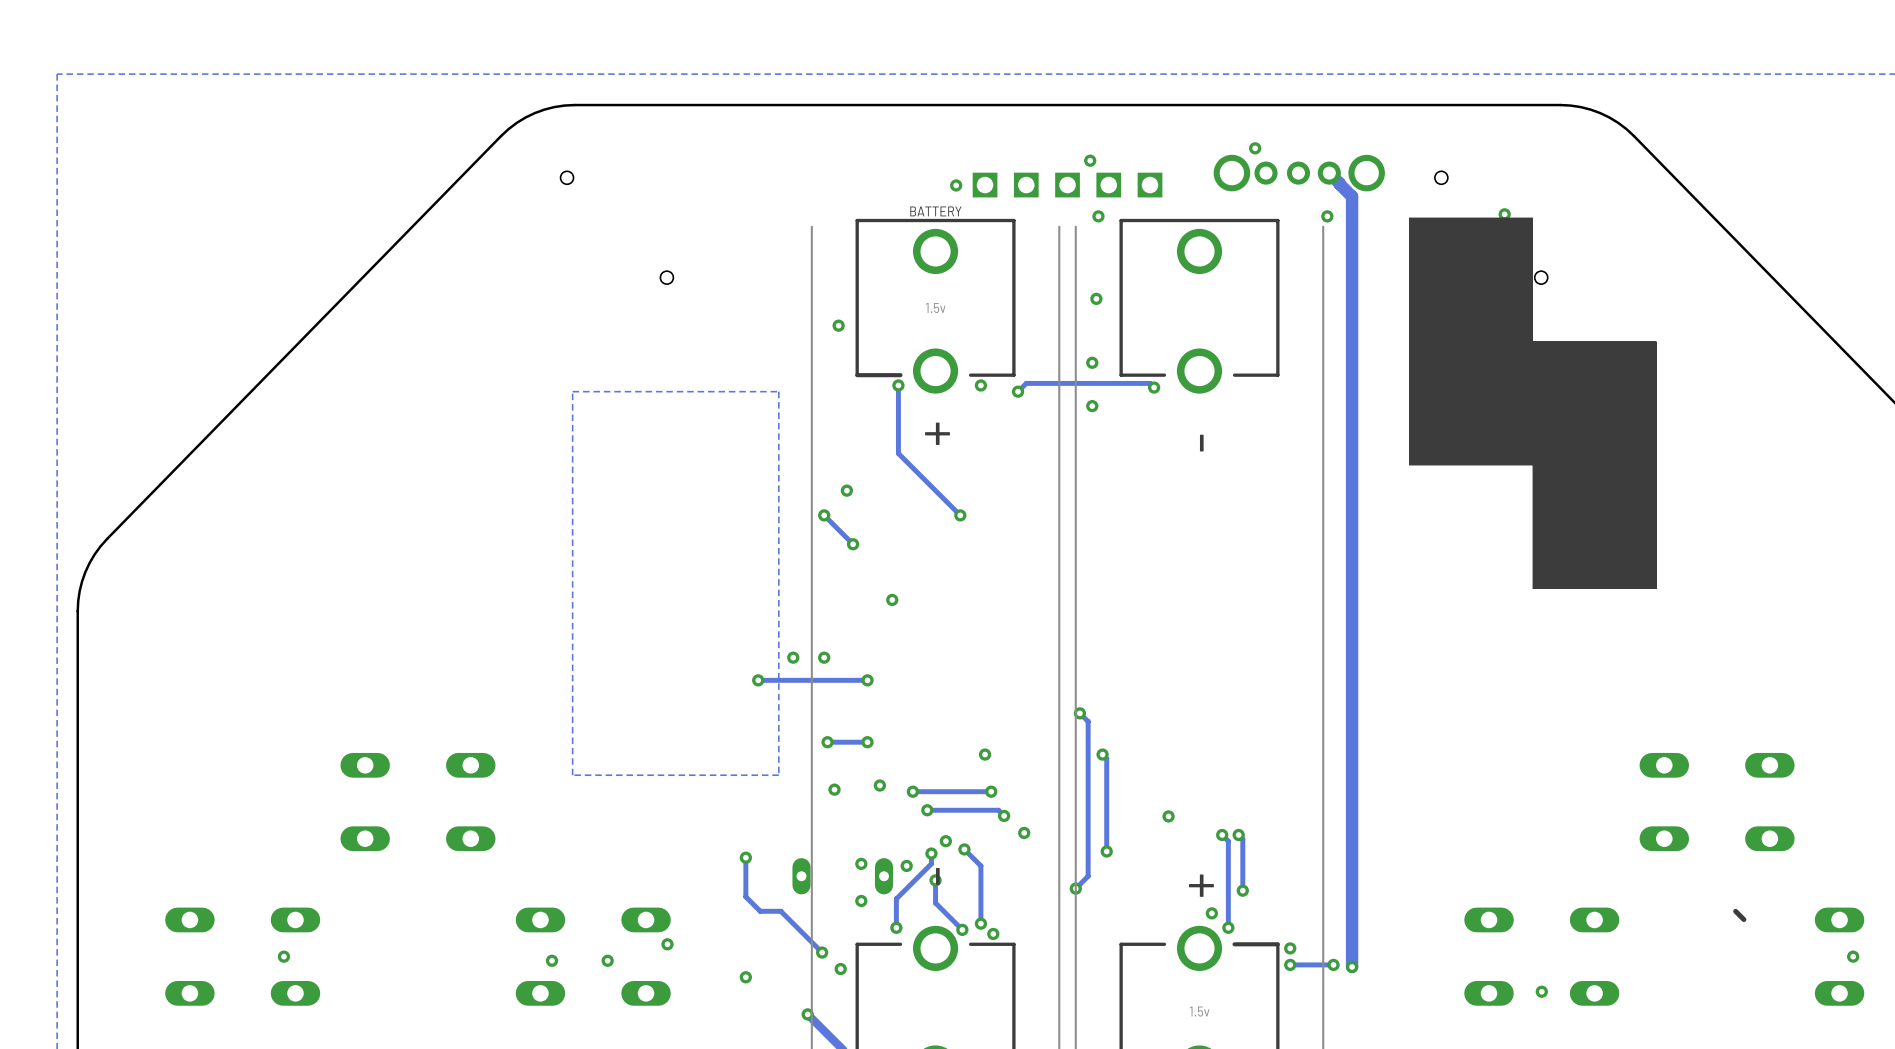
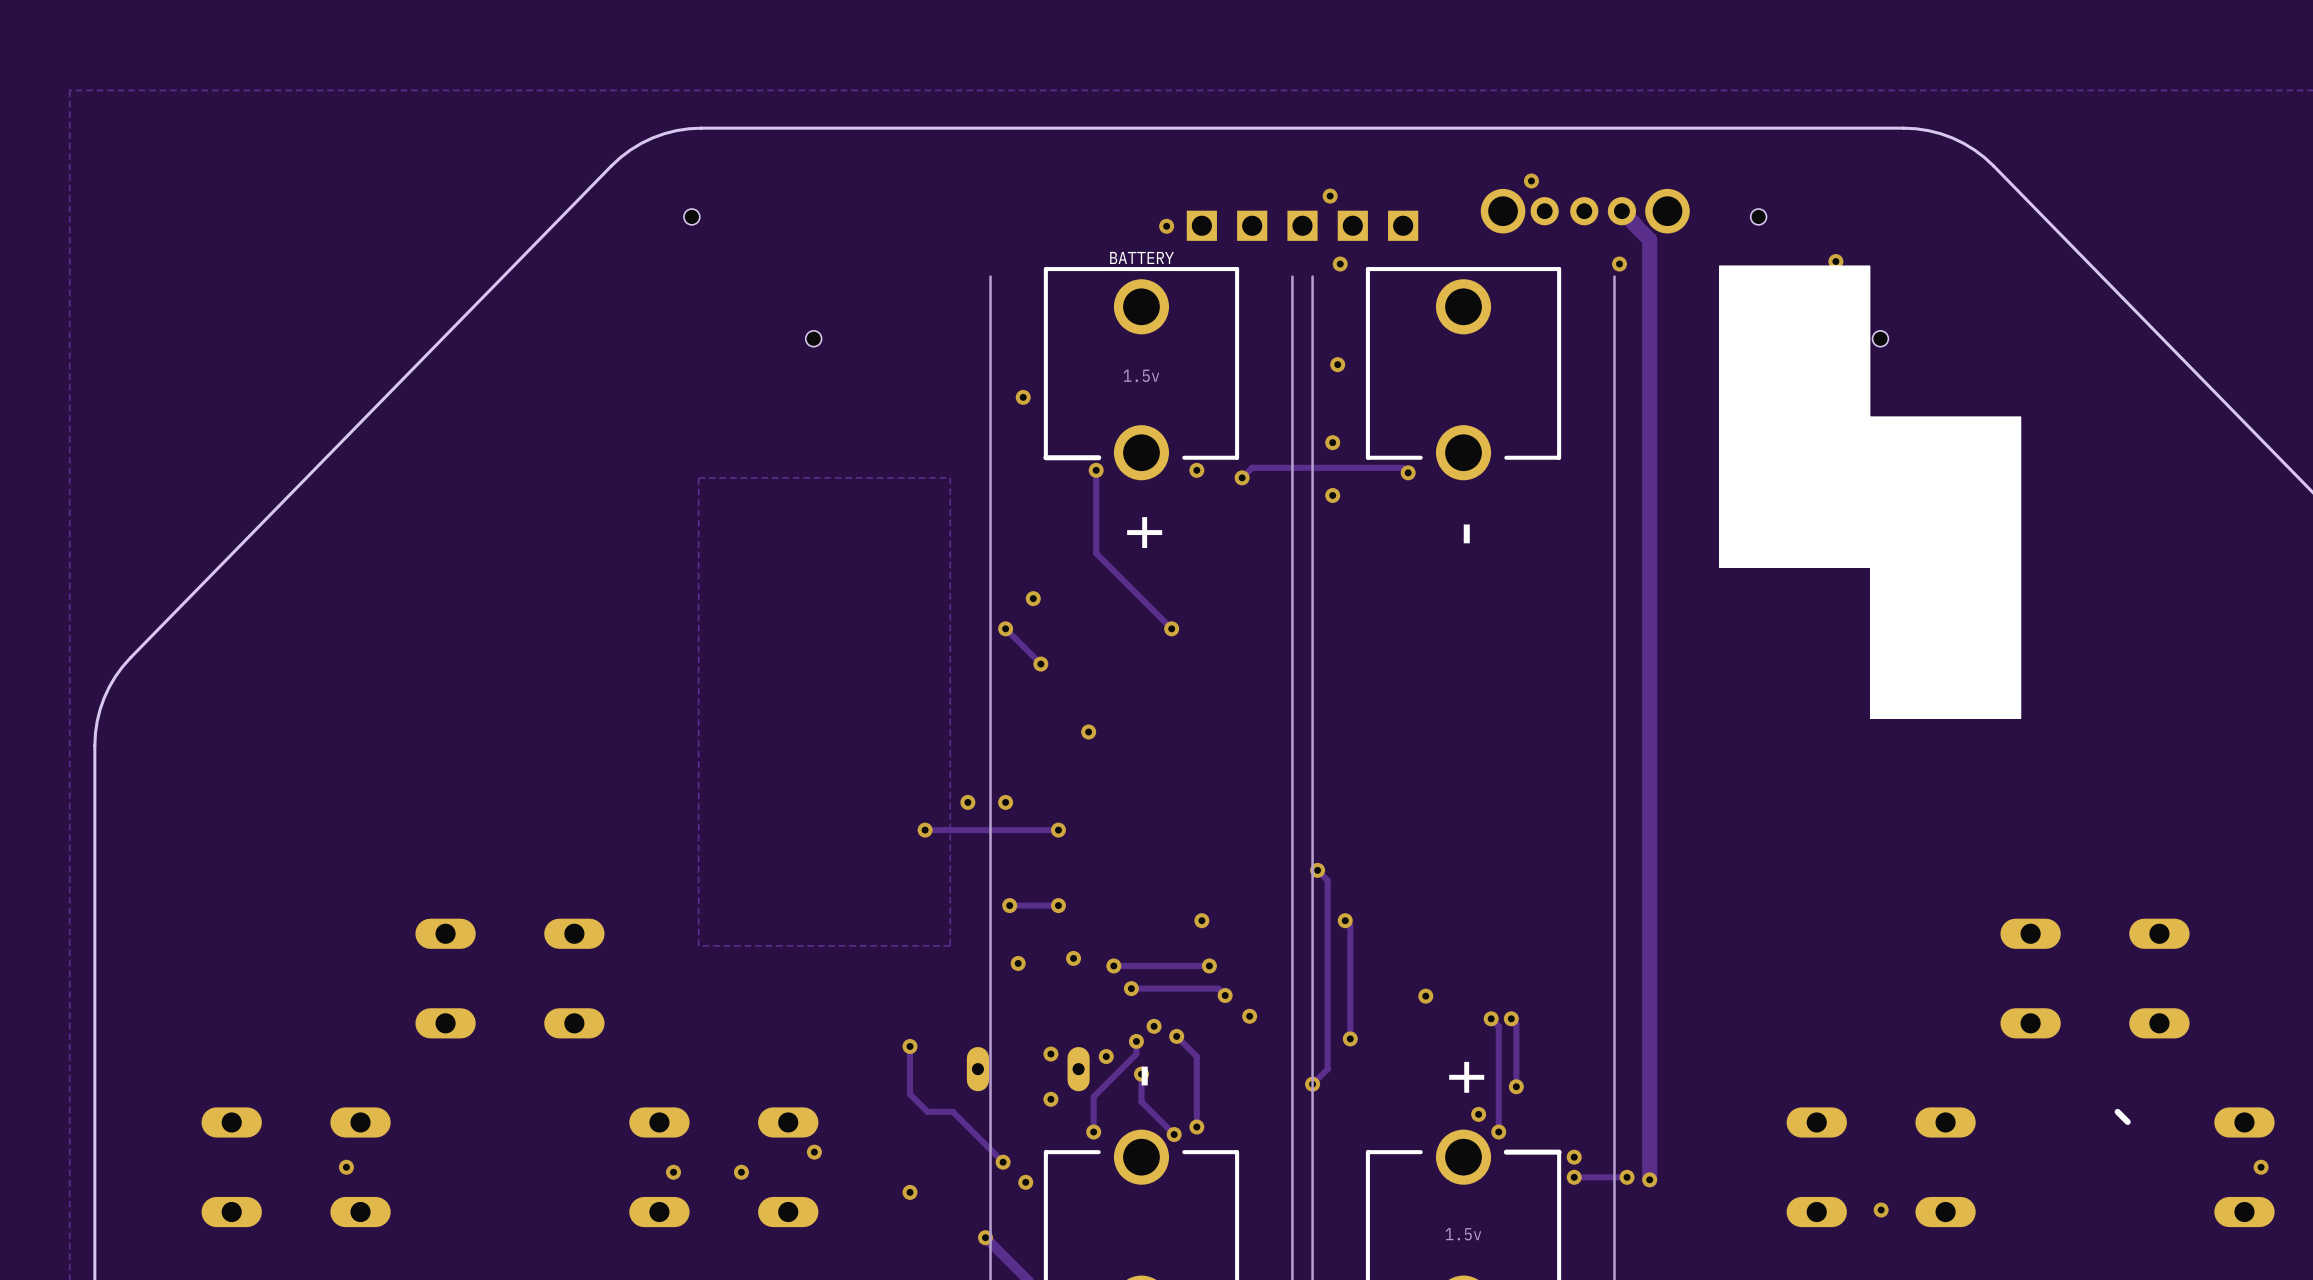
via: (993, 933) -> none

